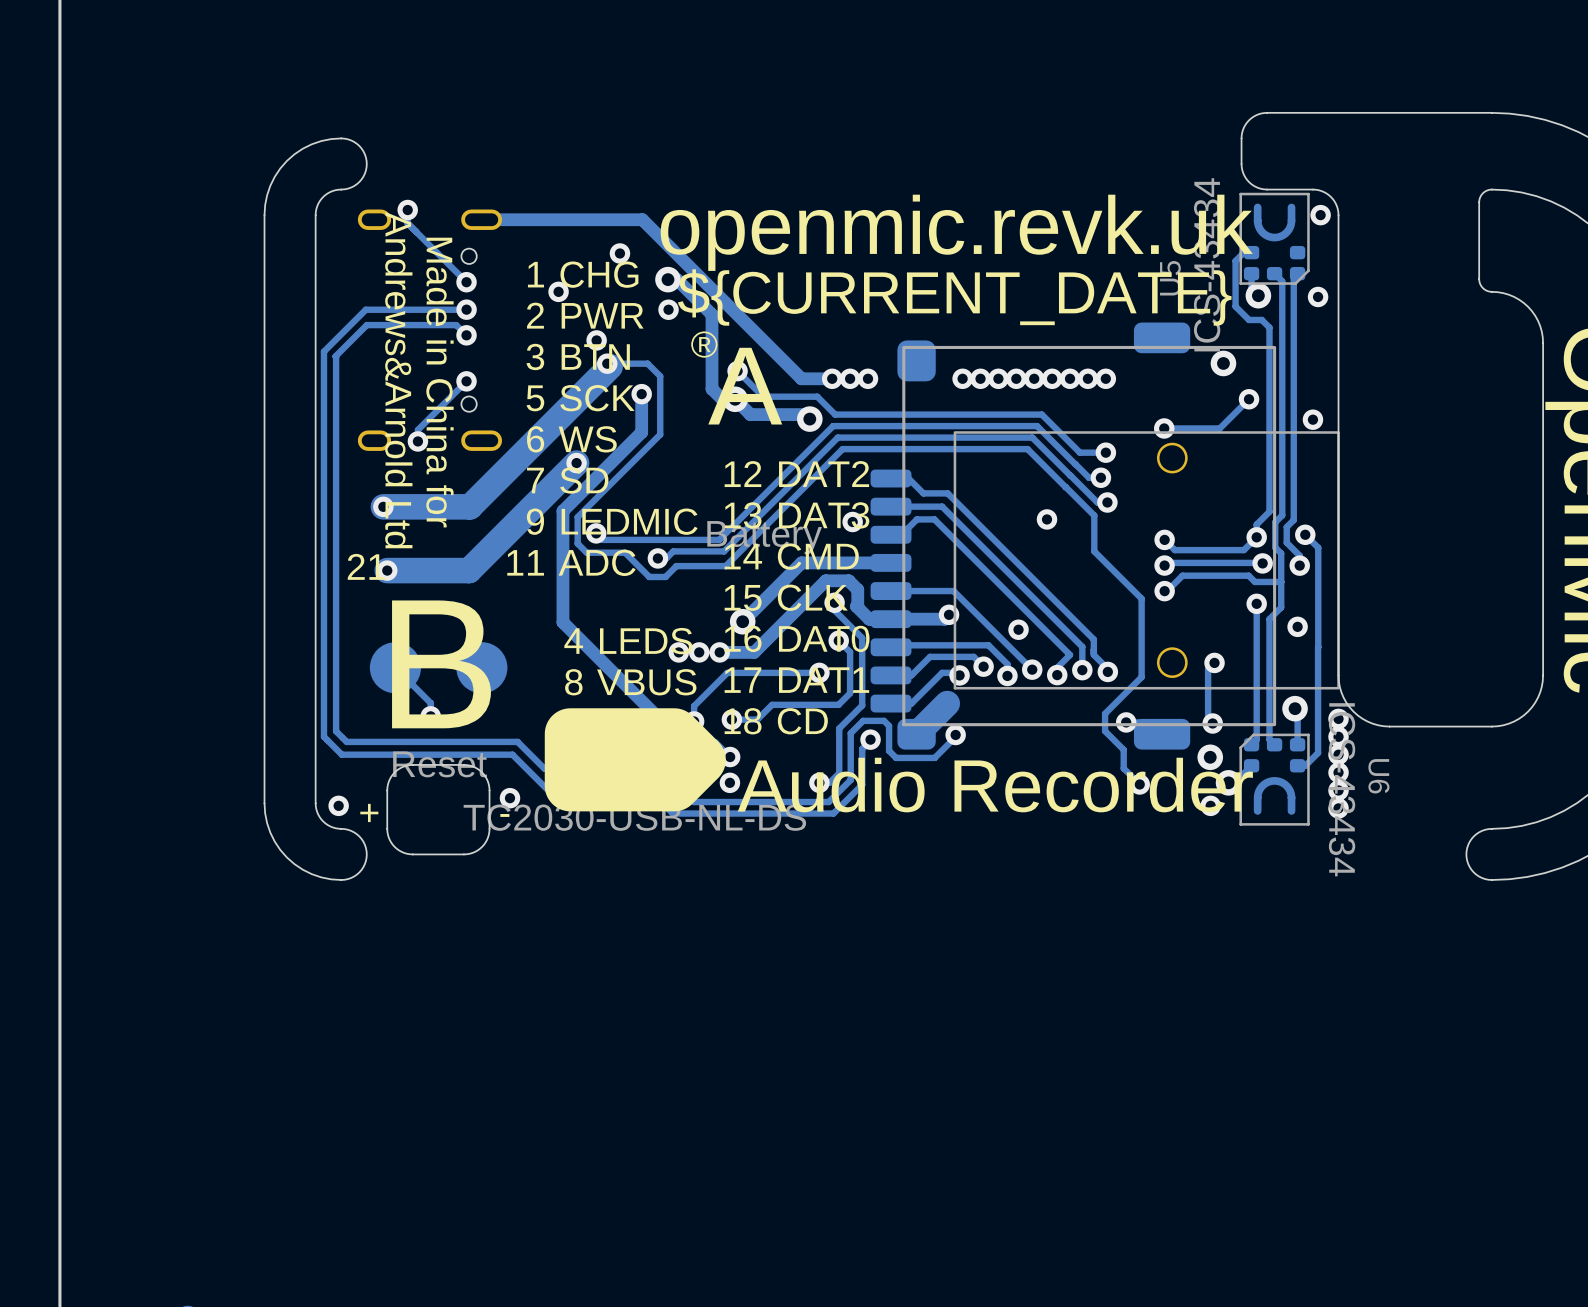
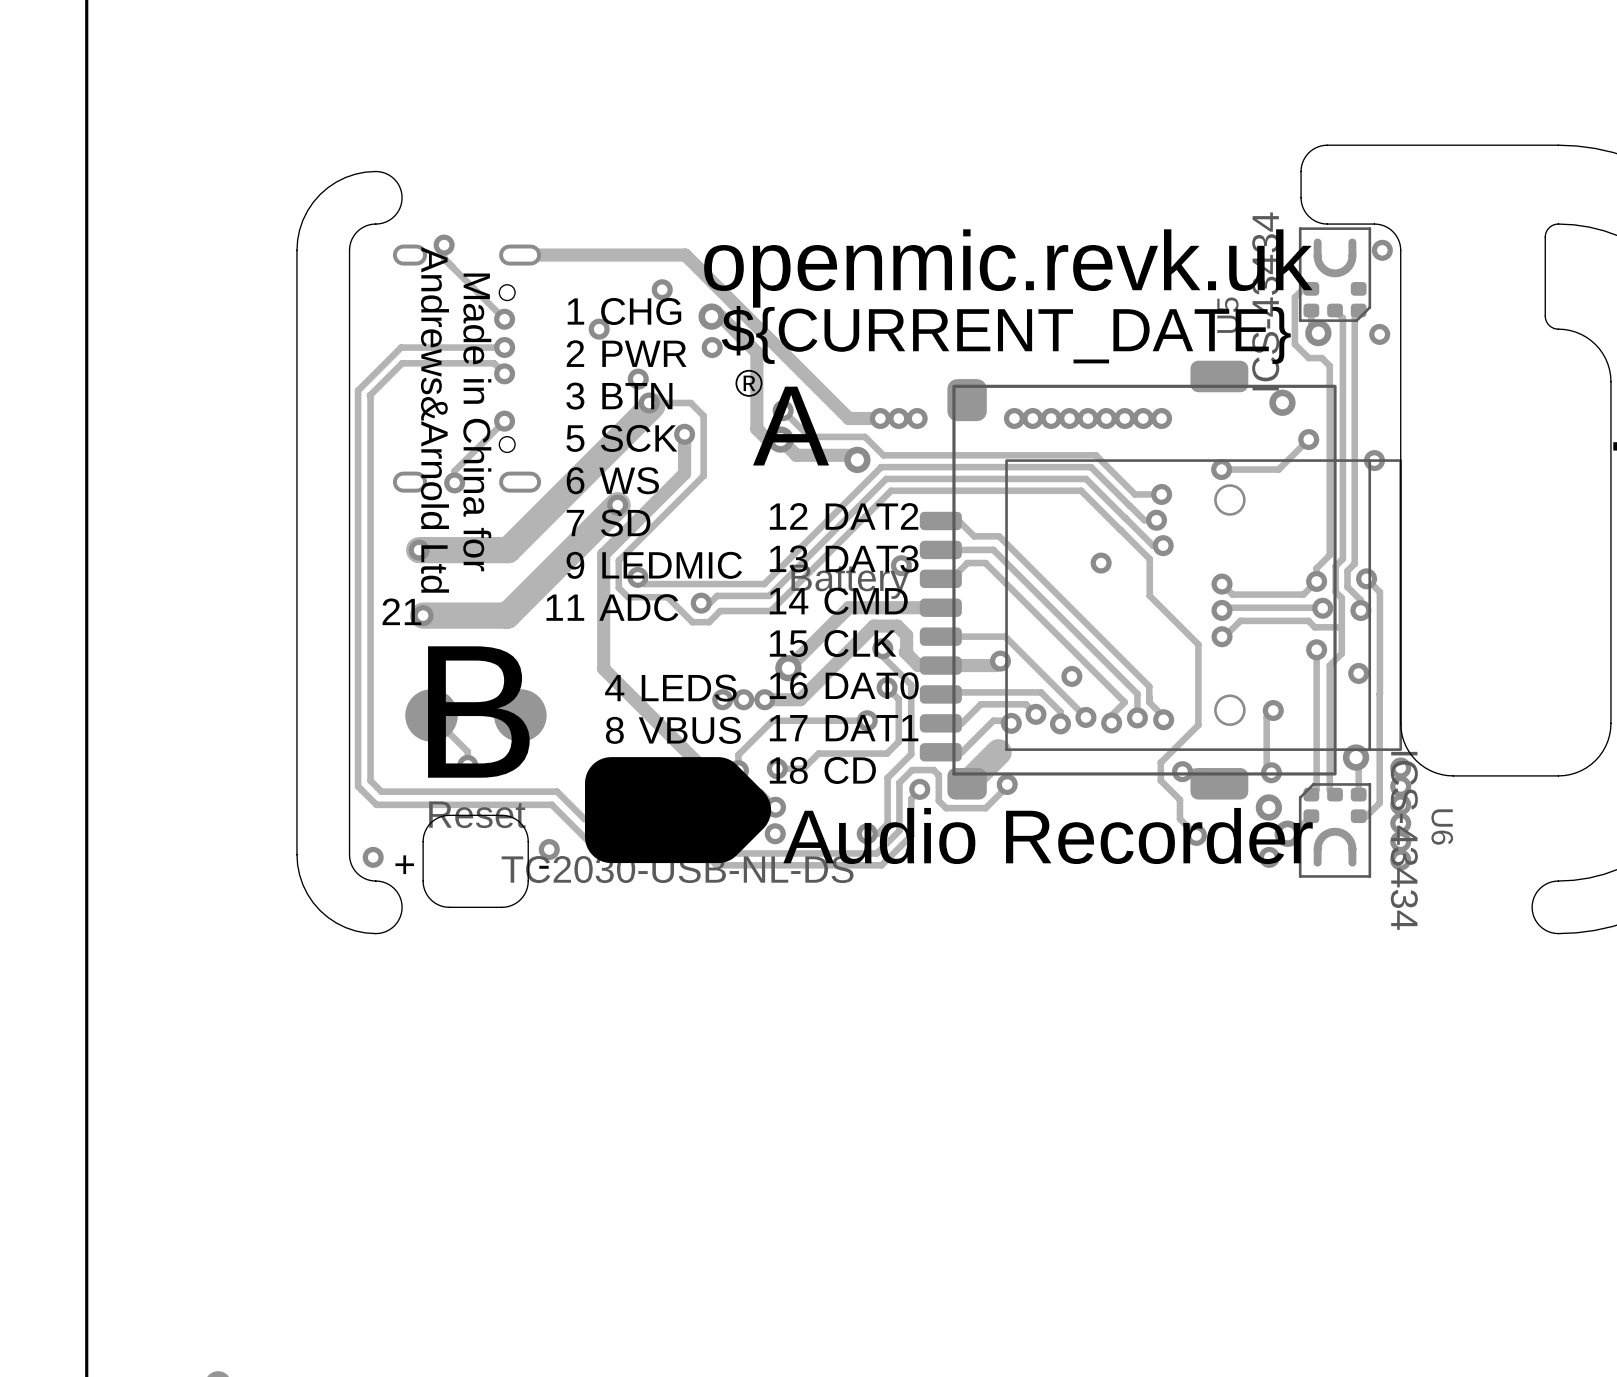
part footprint: [870, 322, 1340, 750] -> [919, 360, 1403, 800]
drawing position: (764, 537) -> (850, 581)

